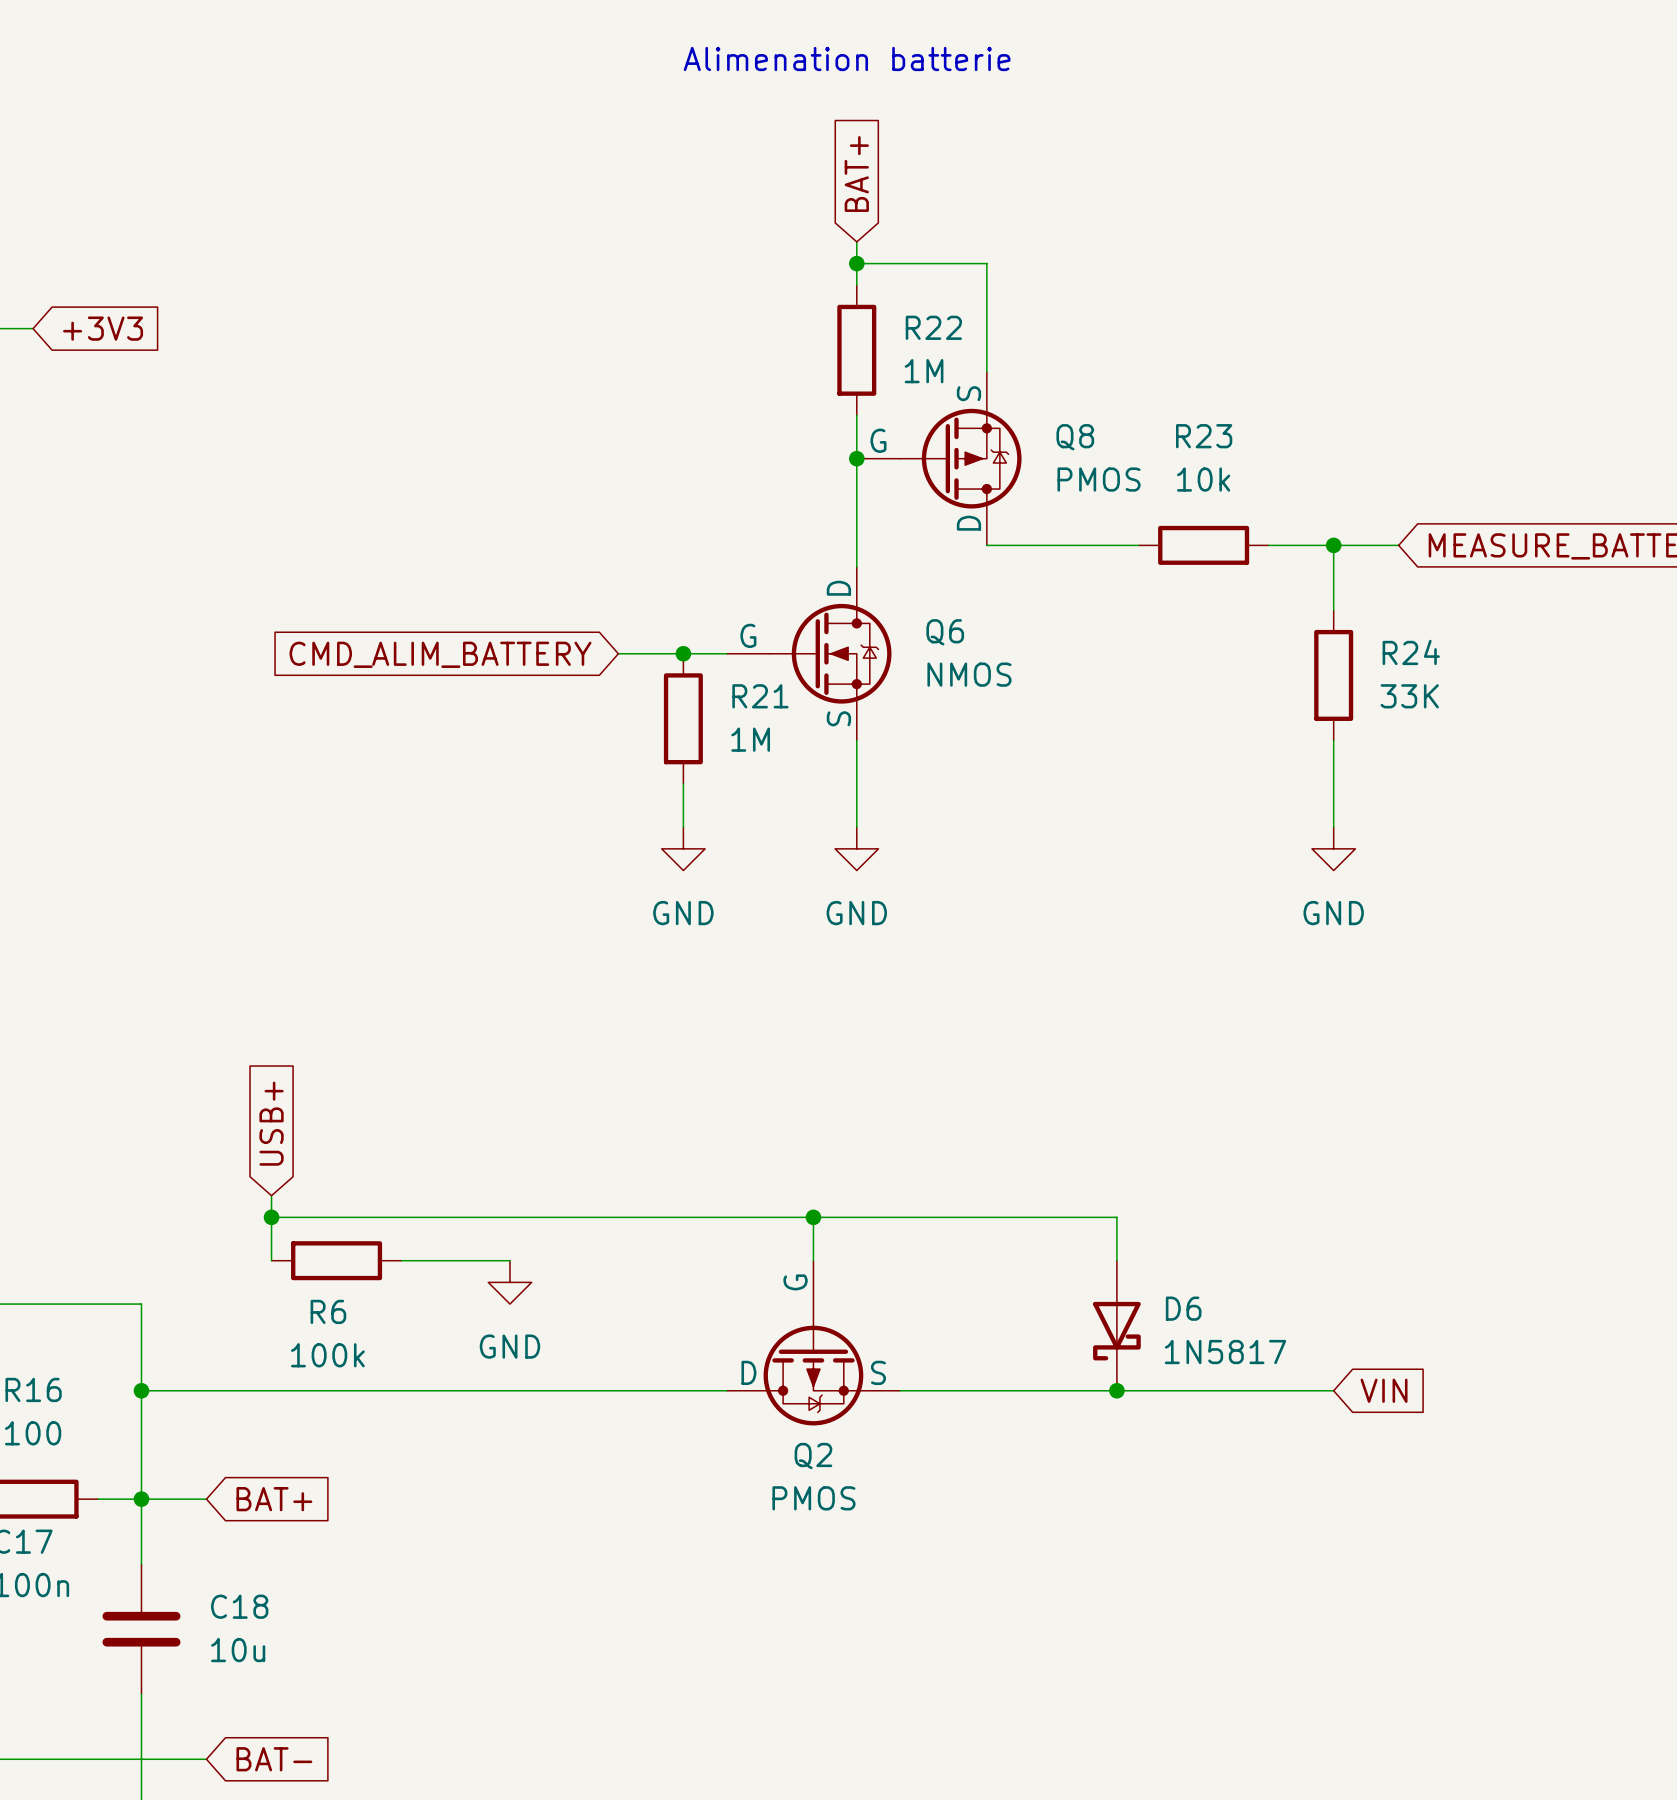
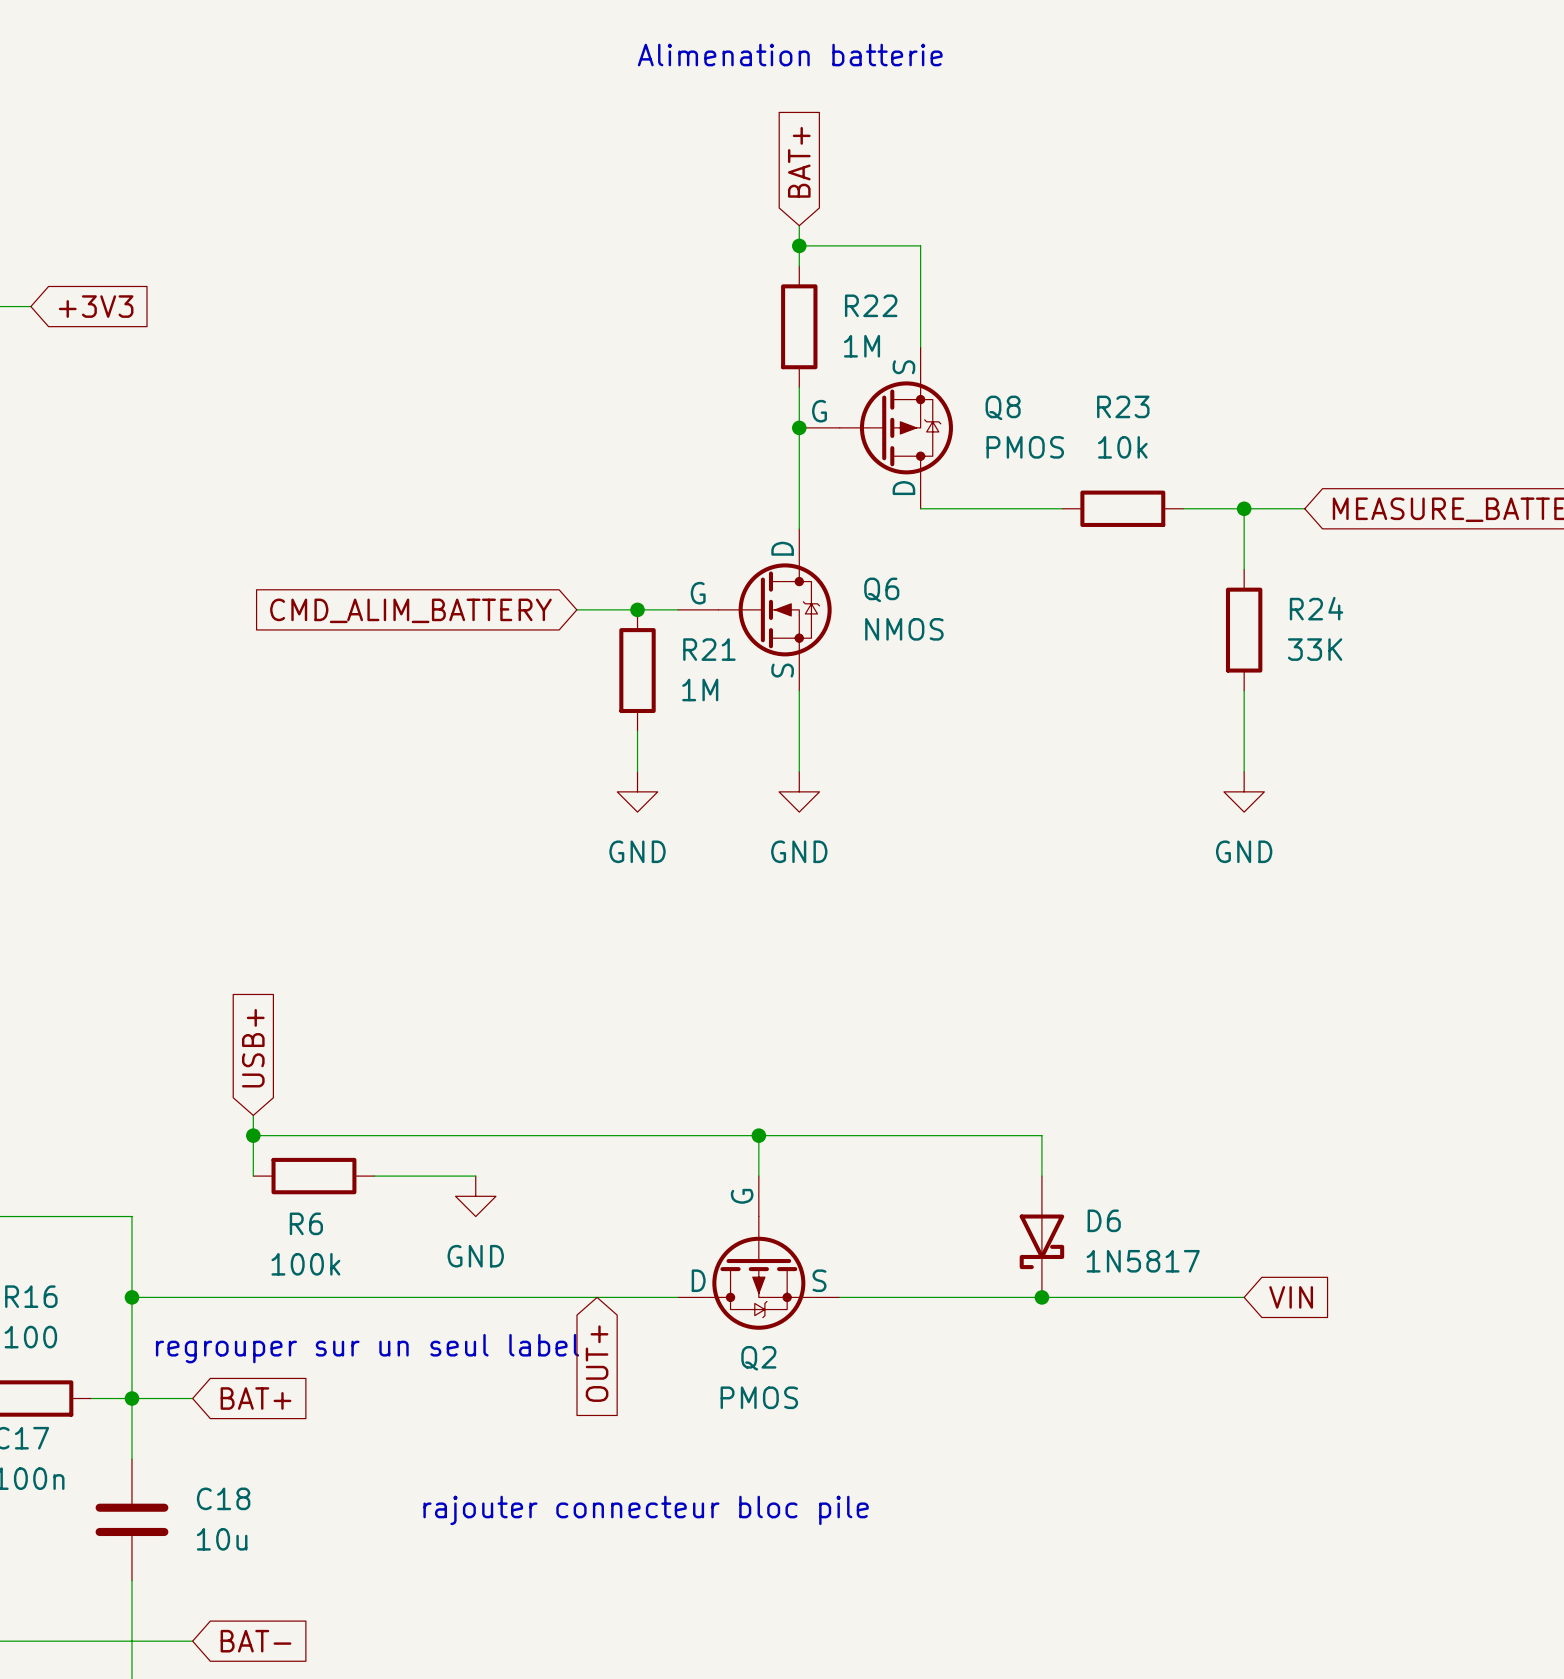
text: none -> regrouper sur un seul label (367, 1348)
global label: none -> OUT+ (597, 1363)
text: none -> rajouter connecteur bloc pile (646, 1510)

